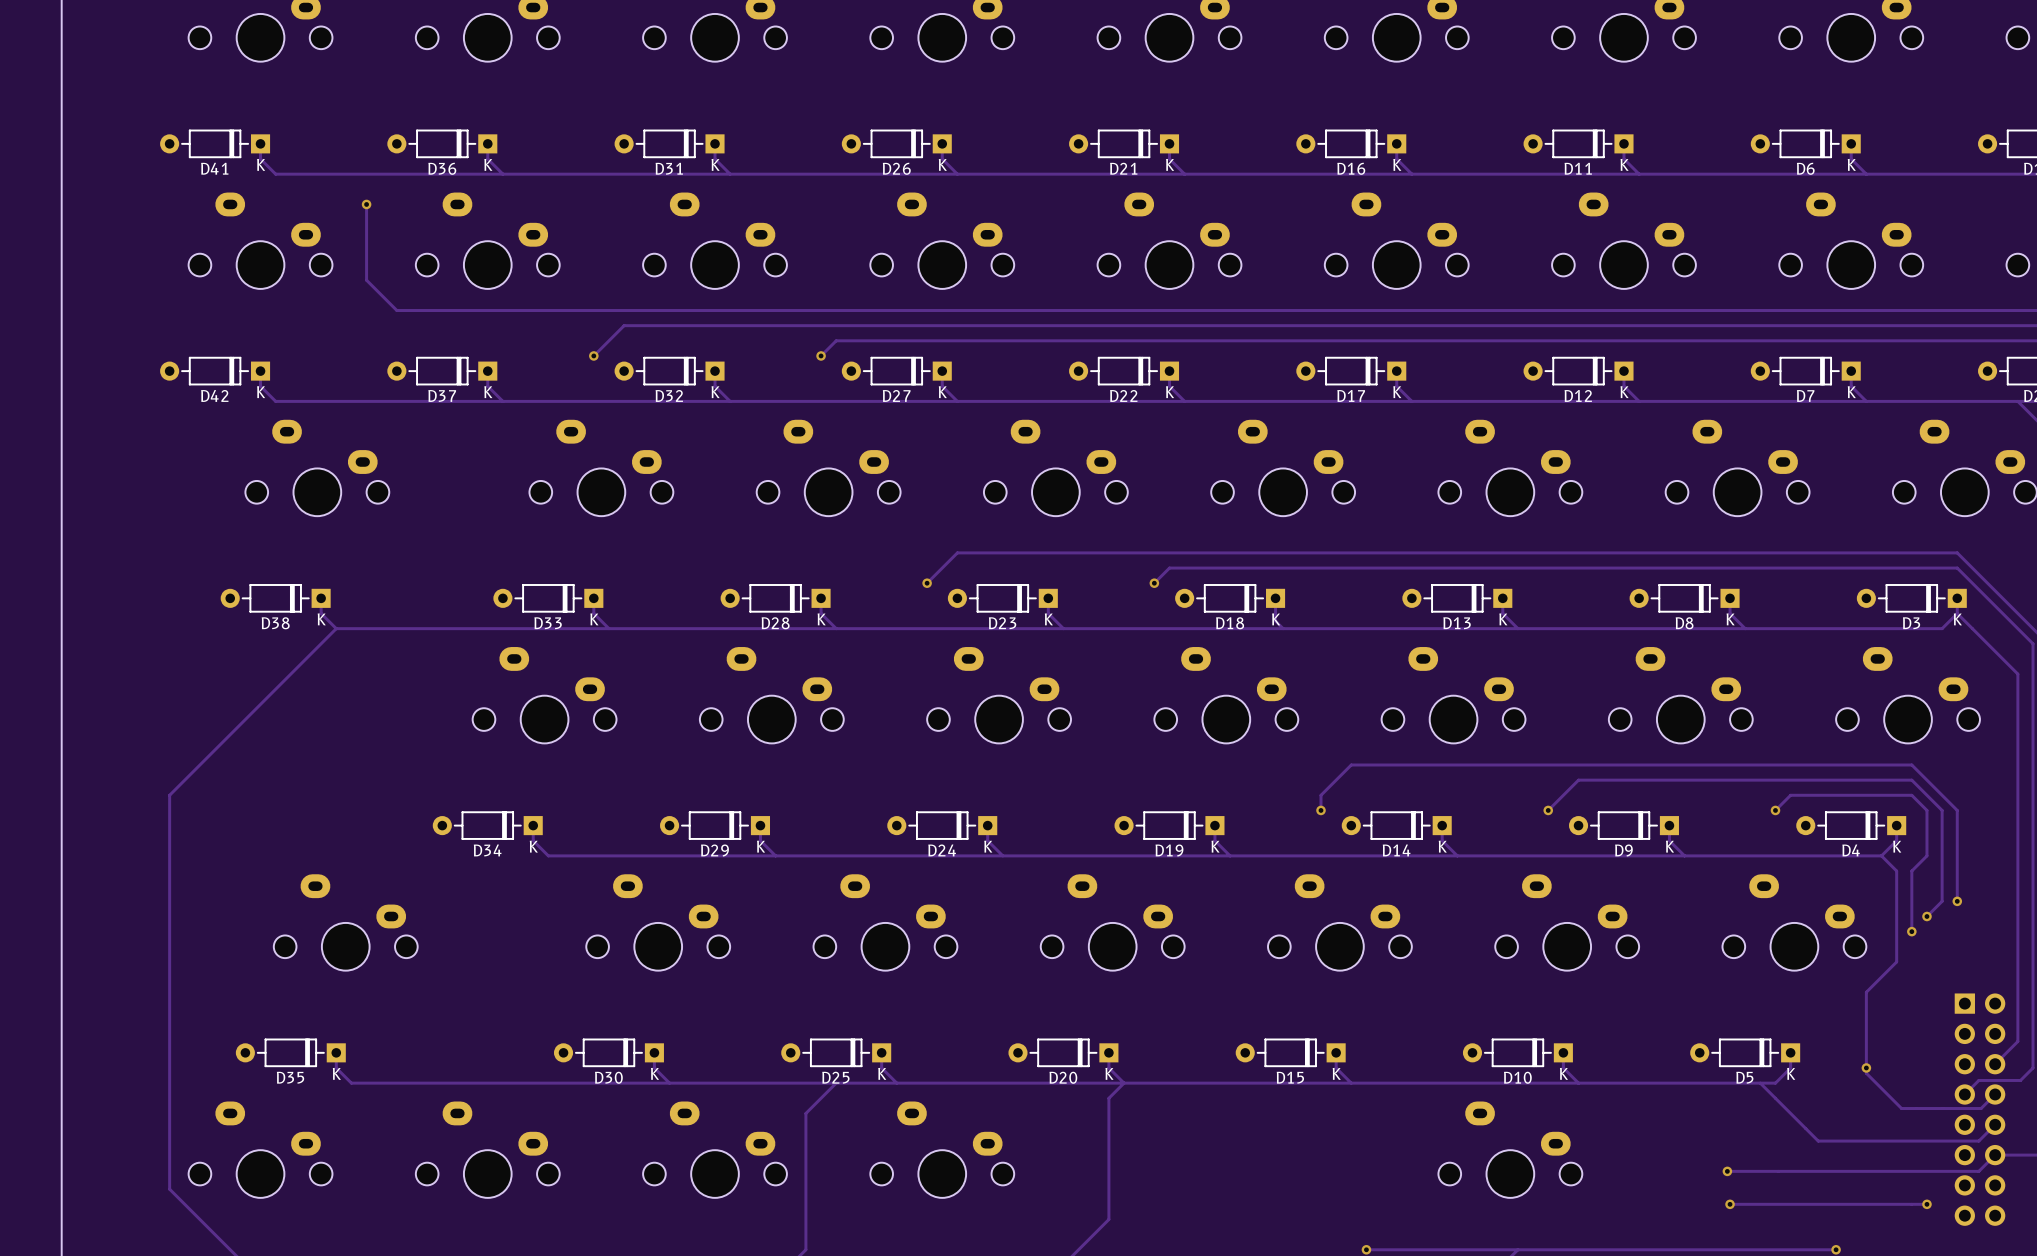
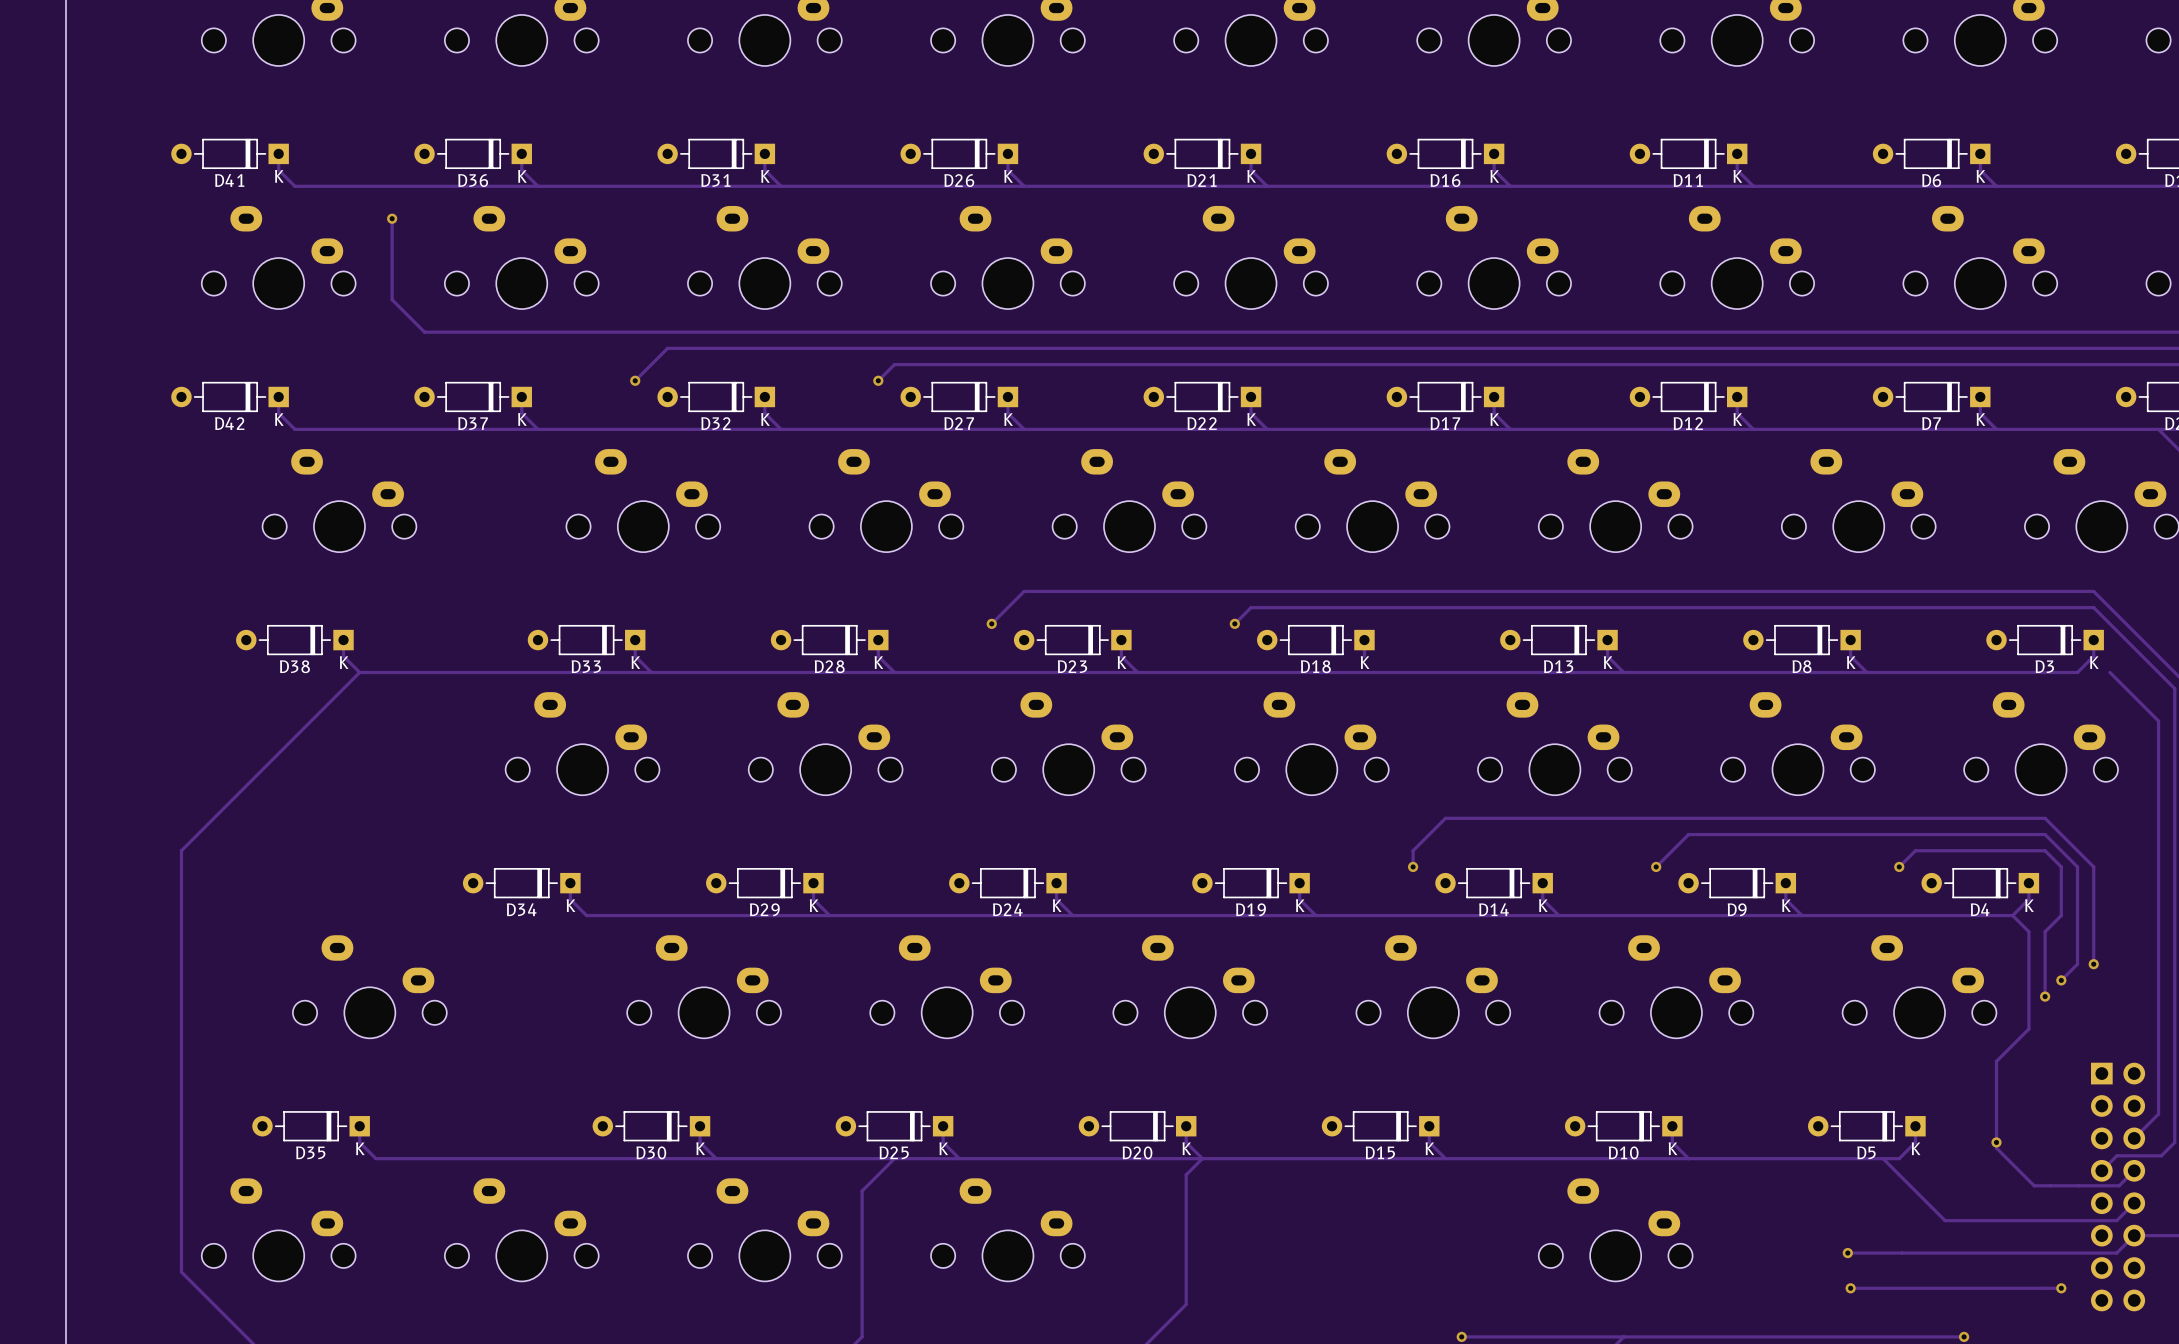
track: (1275, 613) (1275, 621) (1283, 628) -> none
track: (1957, 613) (1972, 628) -> none

